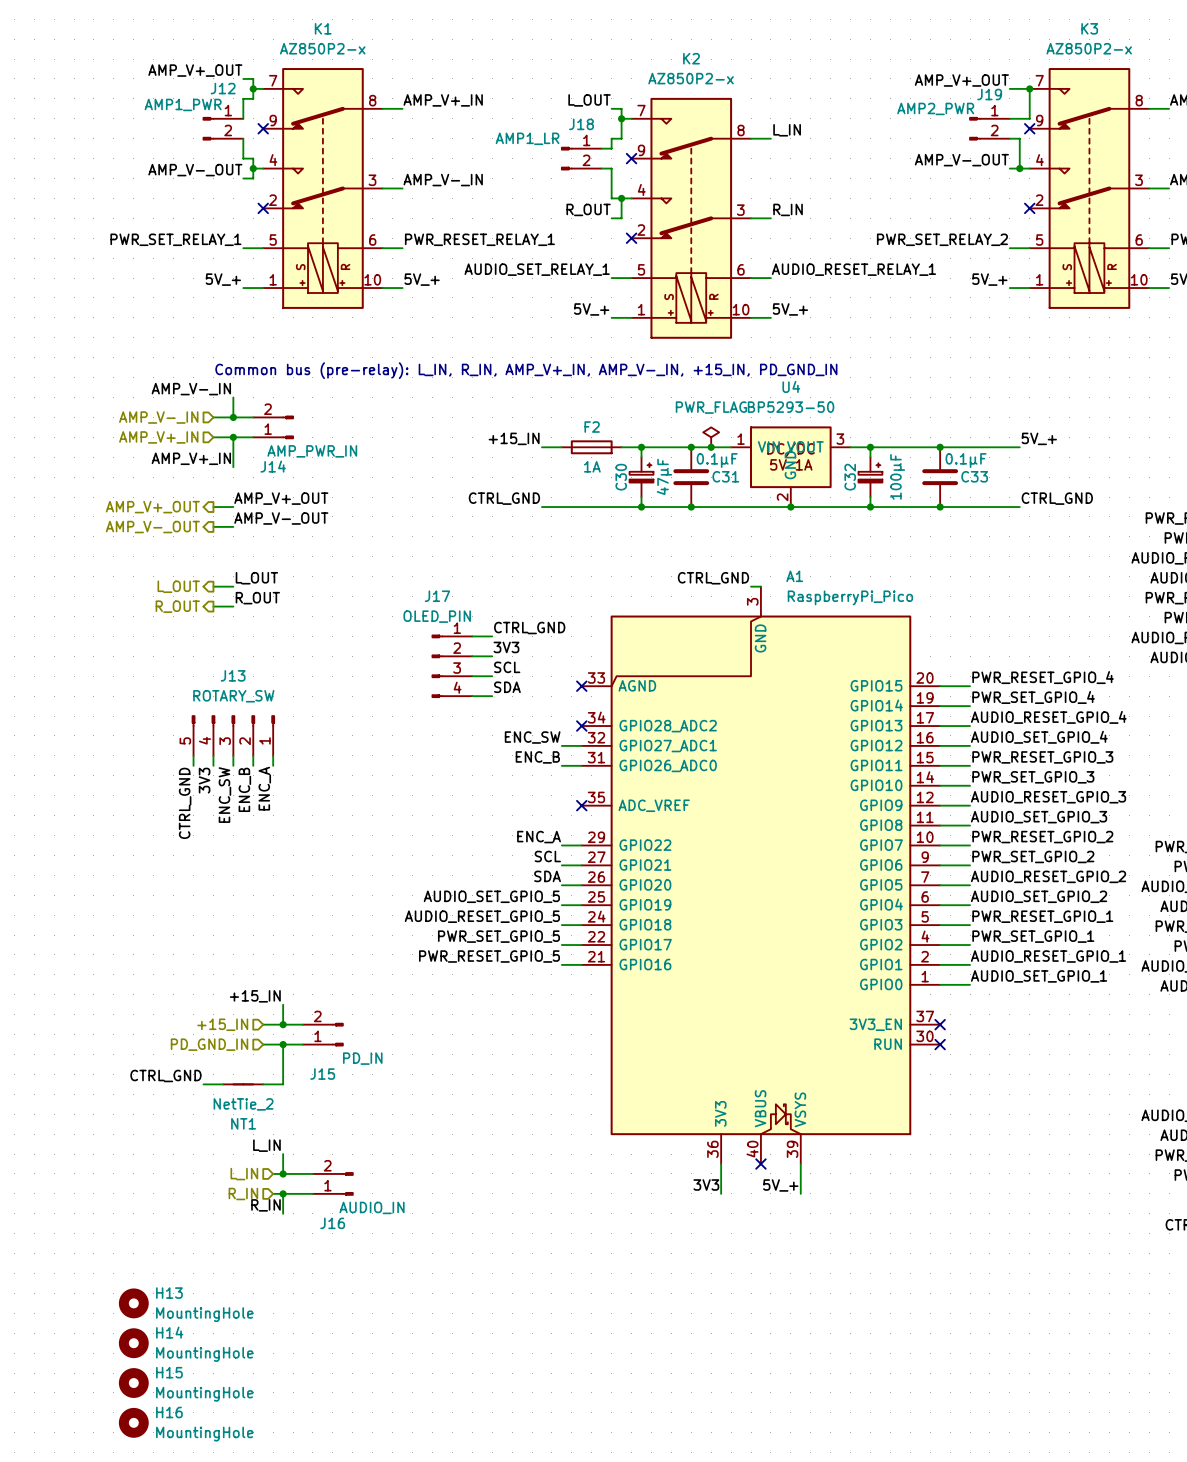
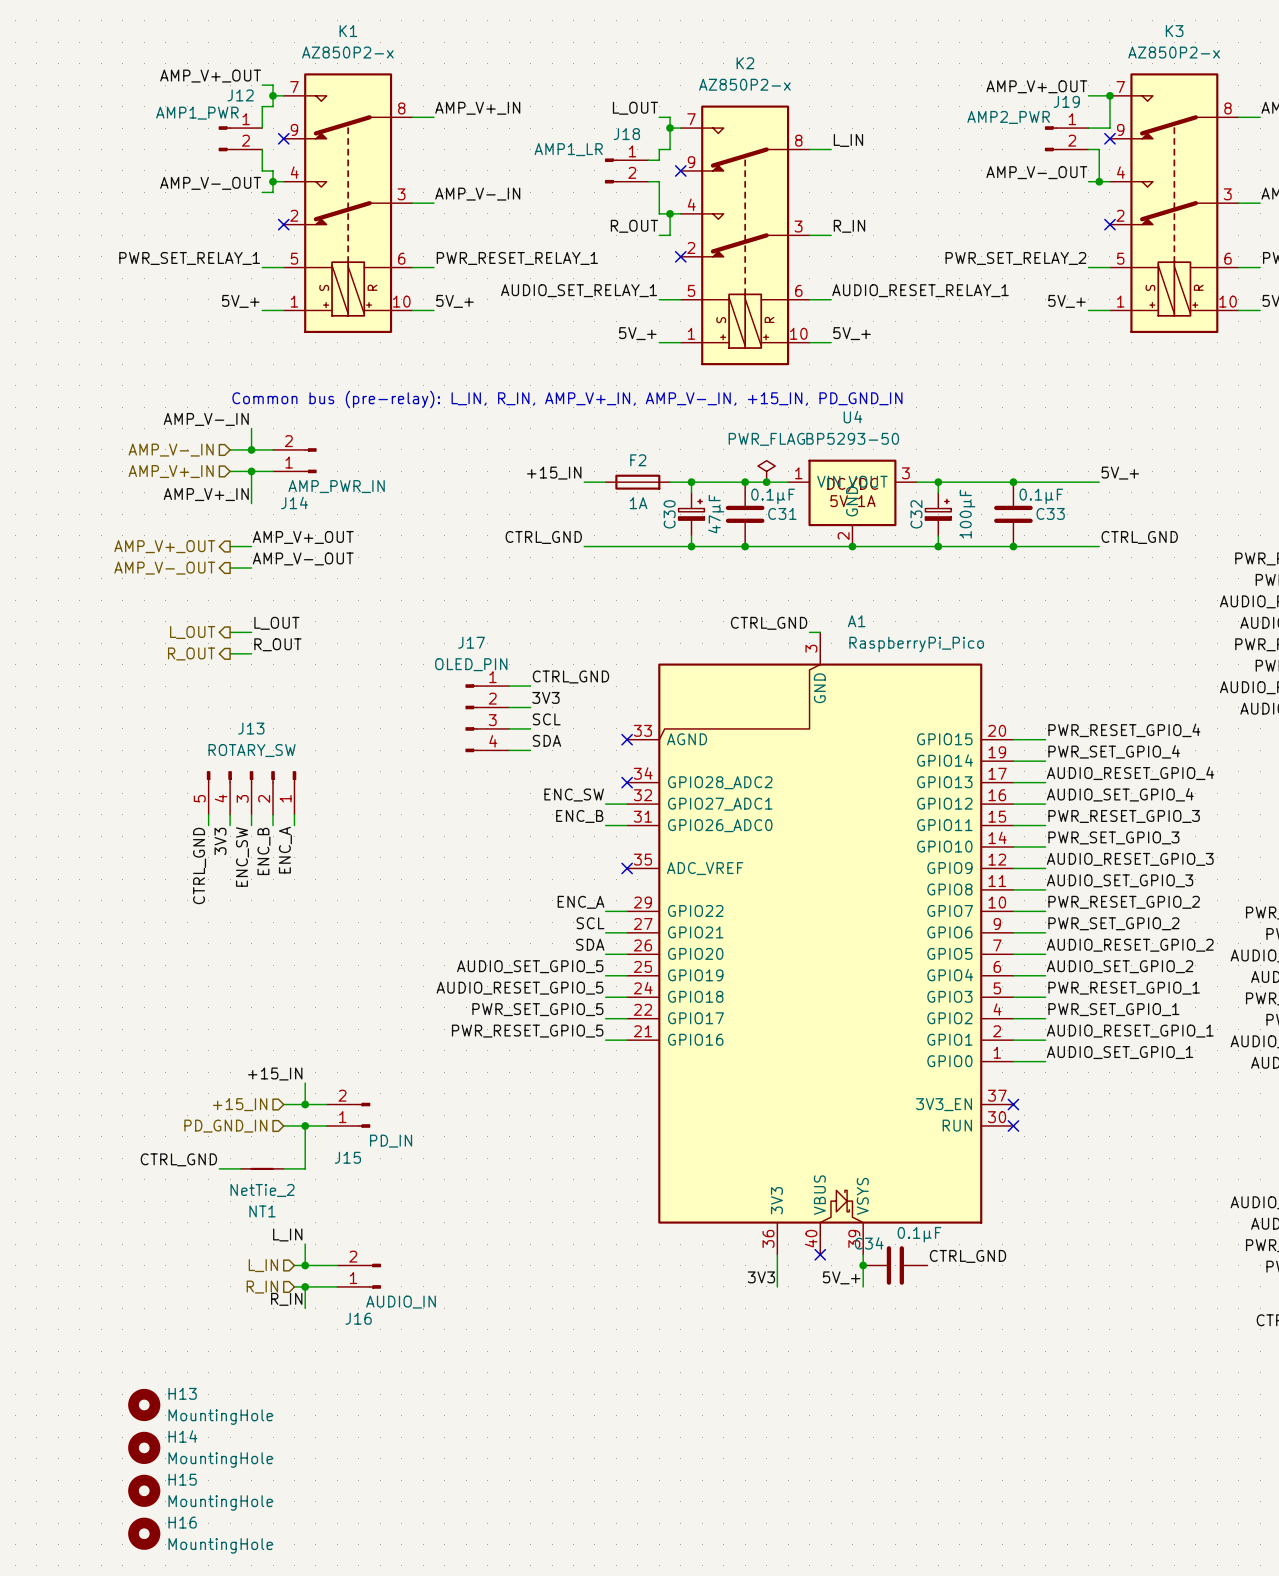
label: none -> CTRL_GND (968, 1256)
junction: none -> (863, 1265)
C34: none -> 0.1μF (895, 1265)

